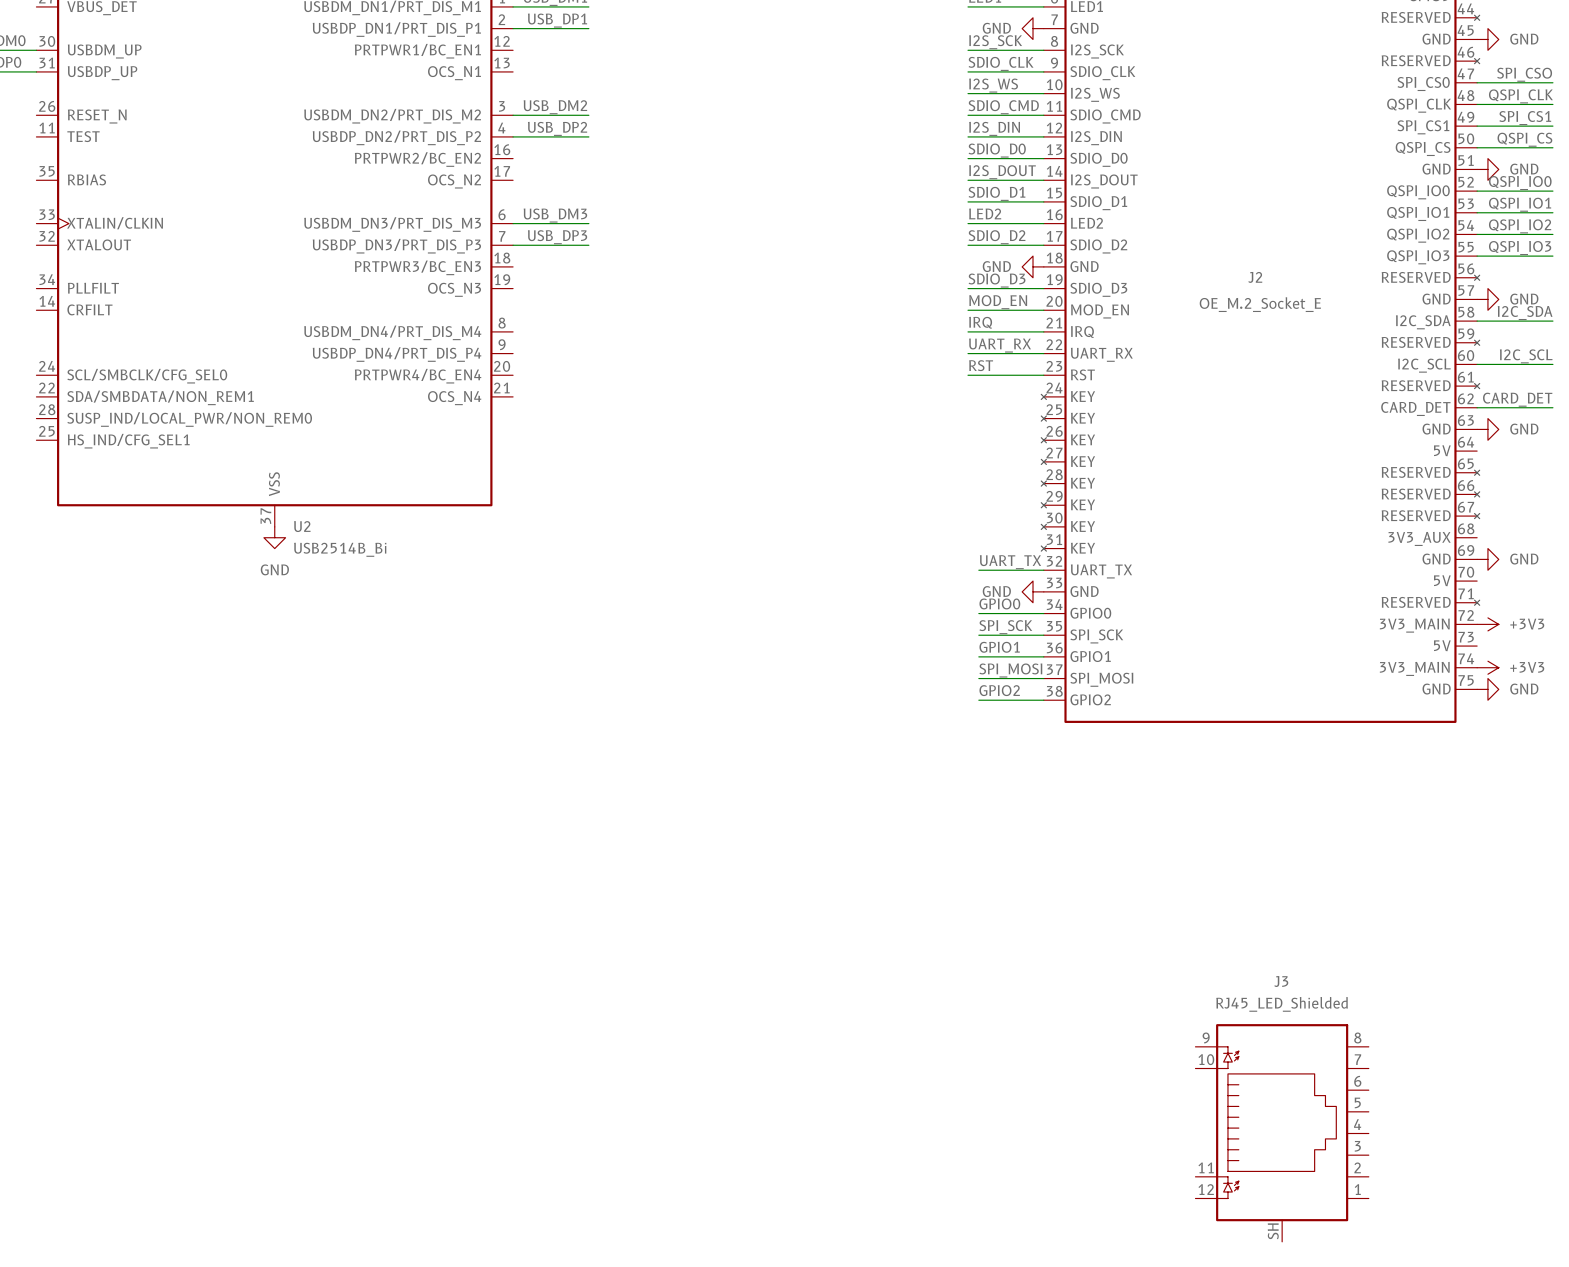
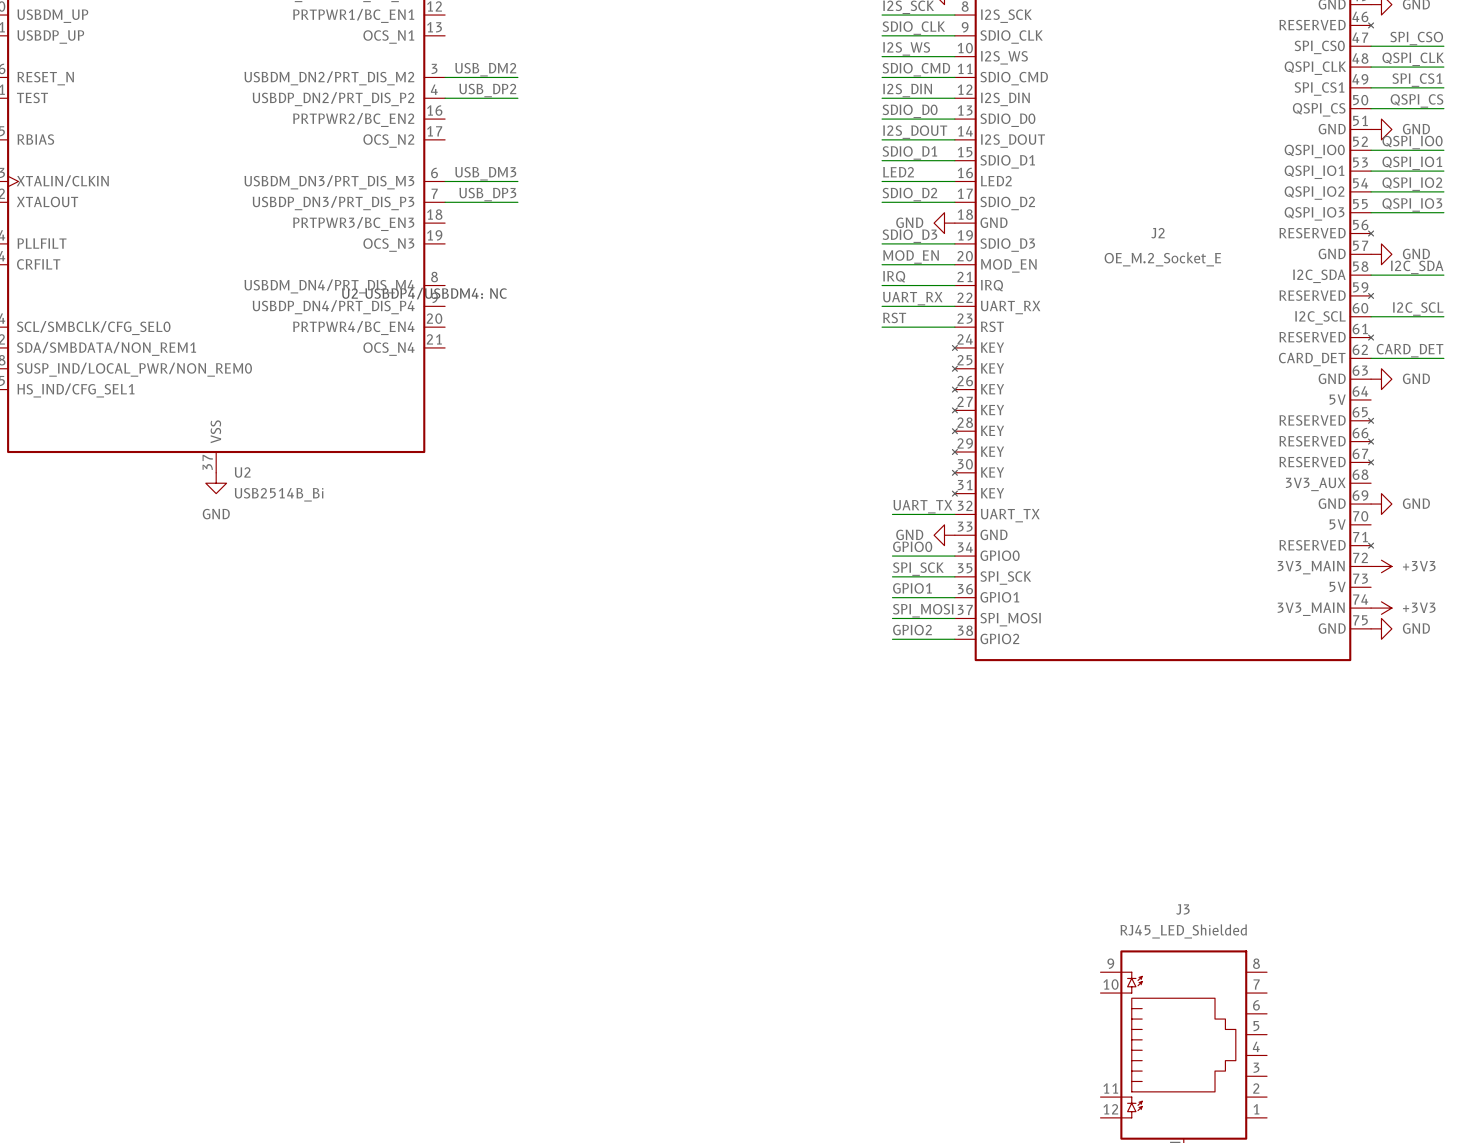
text: none -> U2 USBDP4/USBDM4: NC (424, 293)

